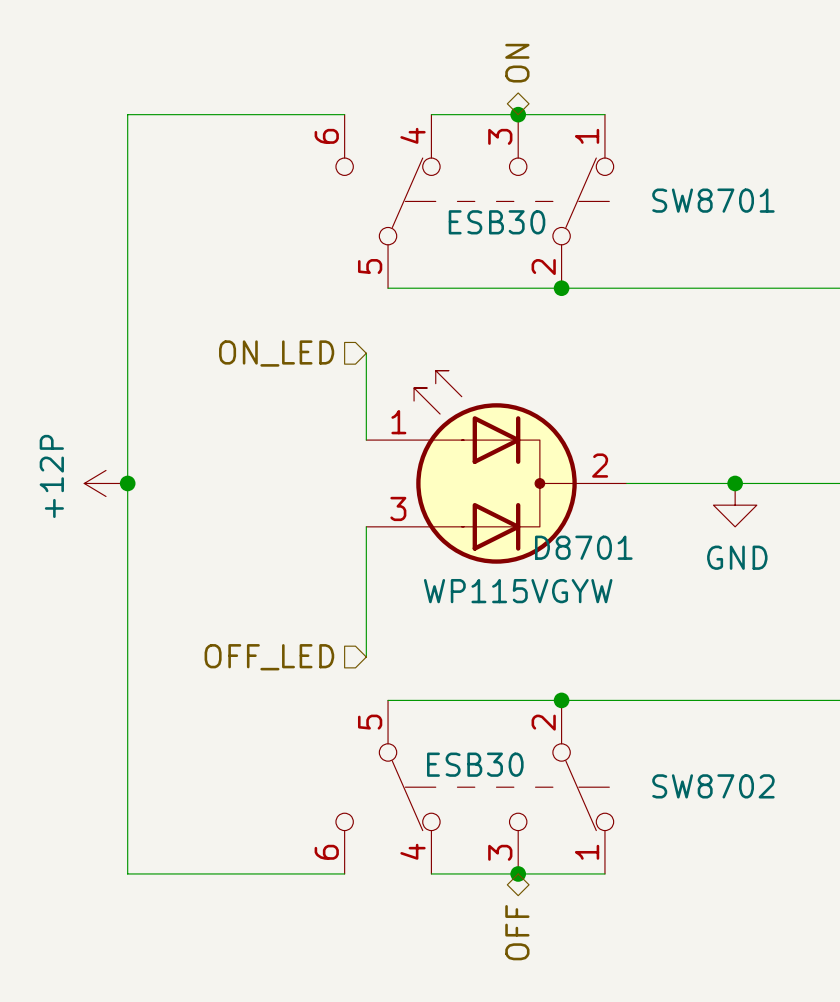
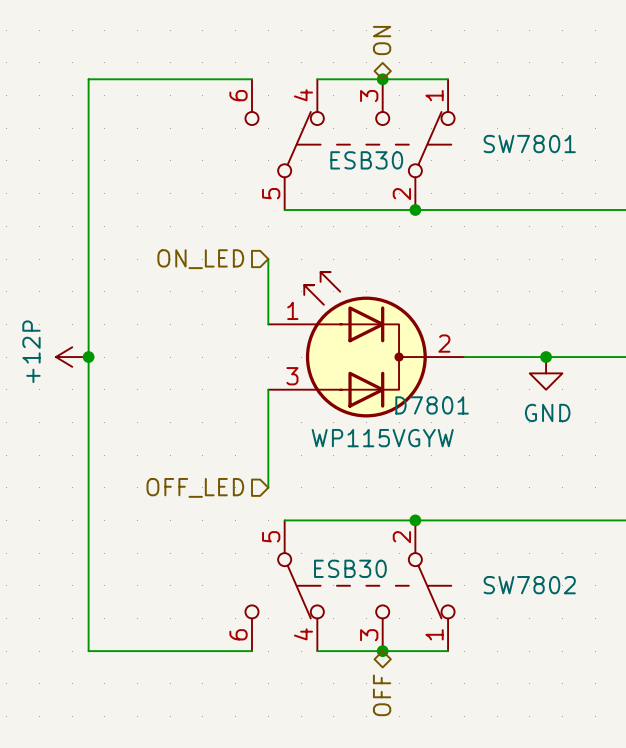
SW8701 name: SW8701 (713, 200) -> SW7801 (529, 144)
D8701 name: D8701 (583, 547) -> D7801 (432, 405)
SW8702 name: SW8702 (713, 786) -> SW7802 (529, 585)

